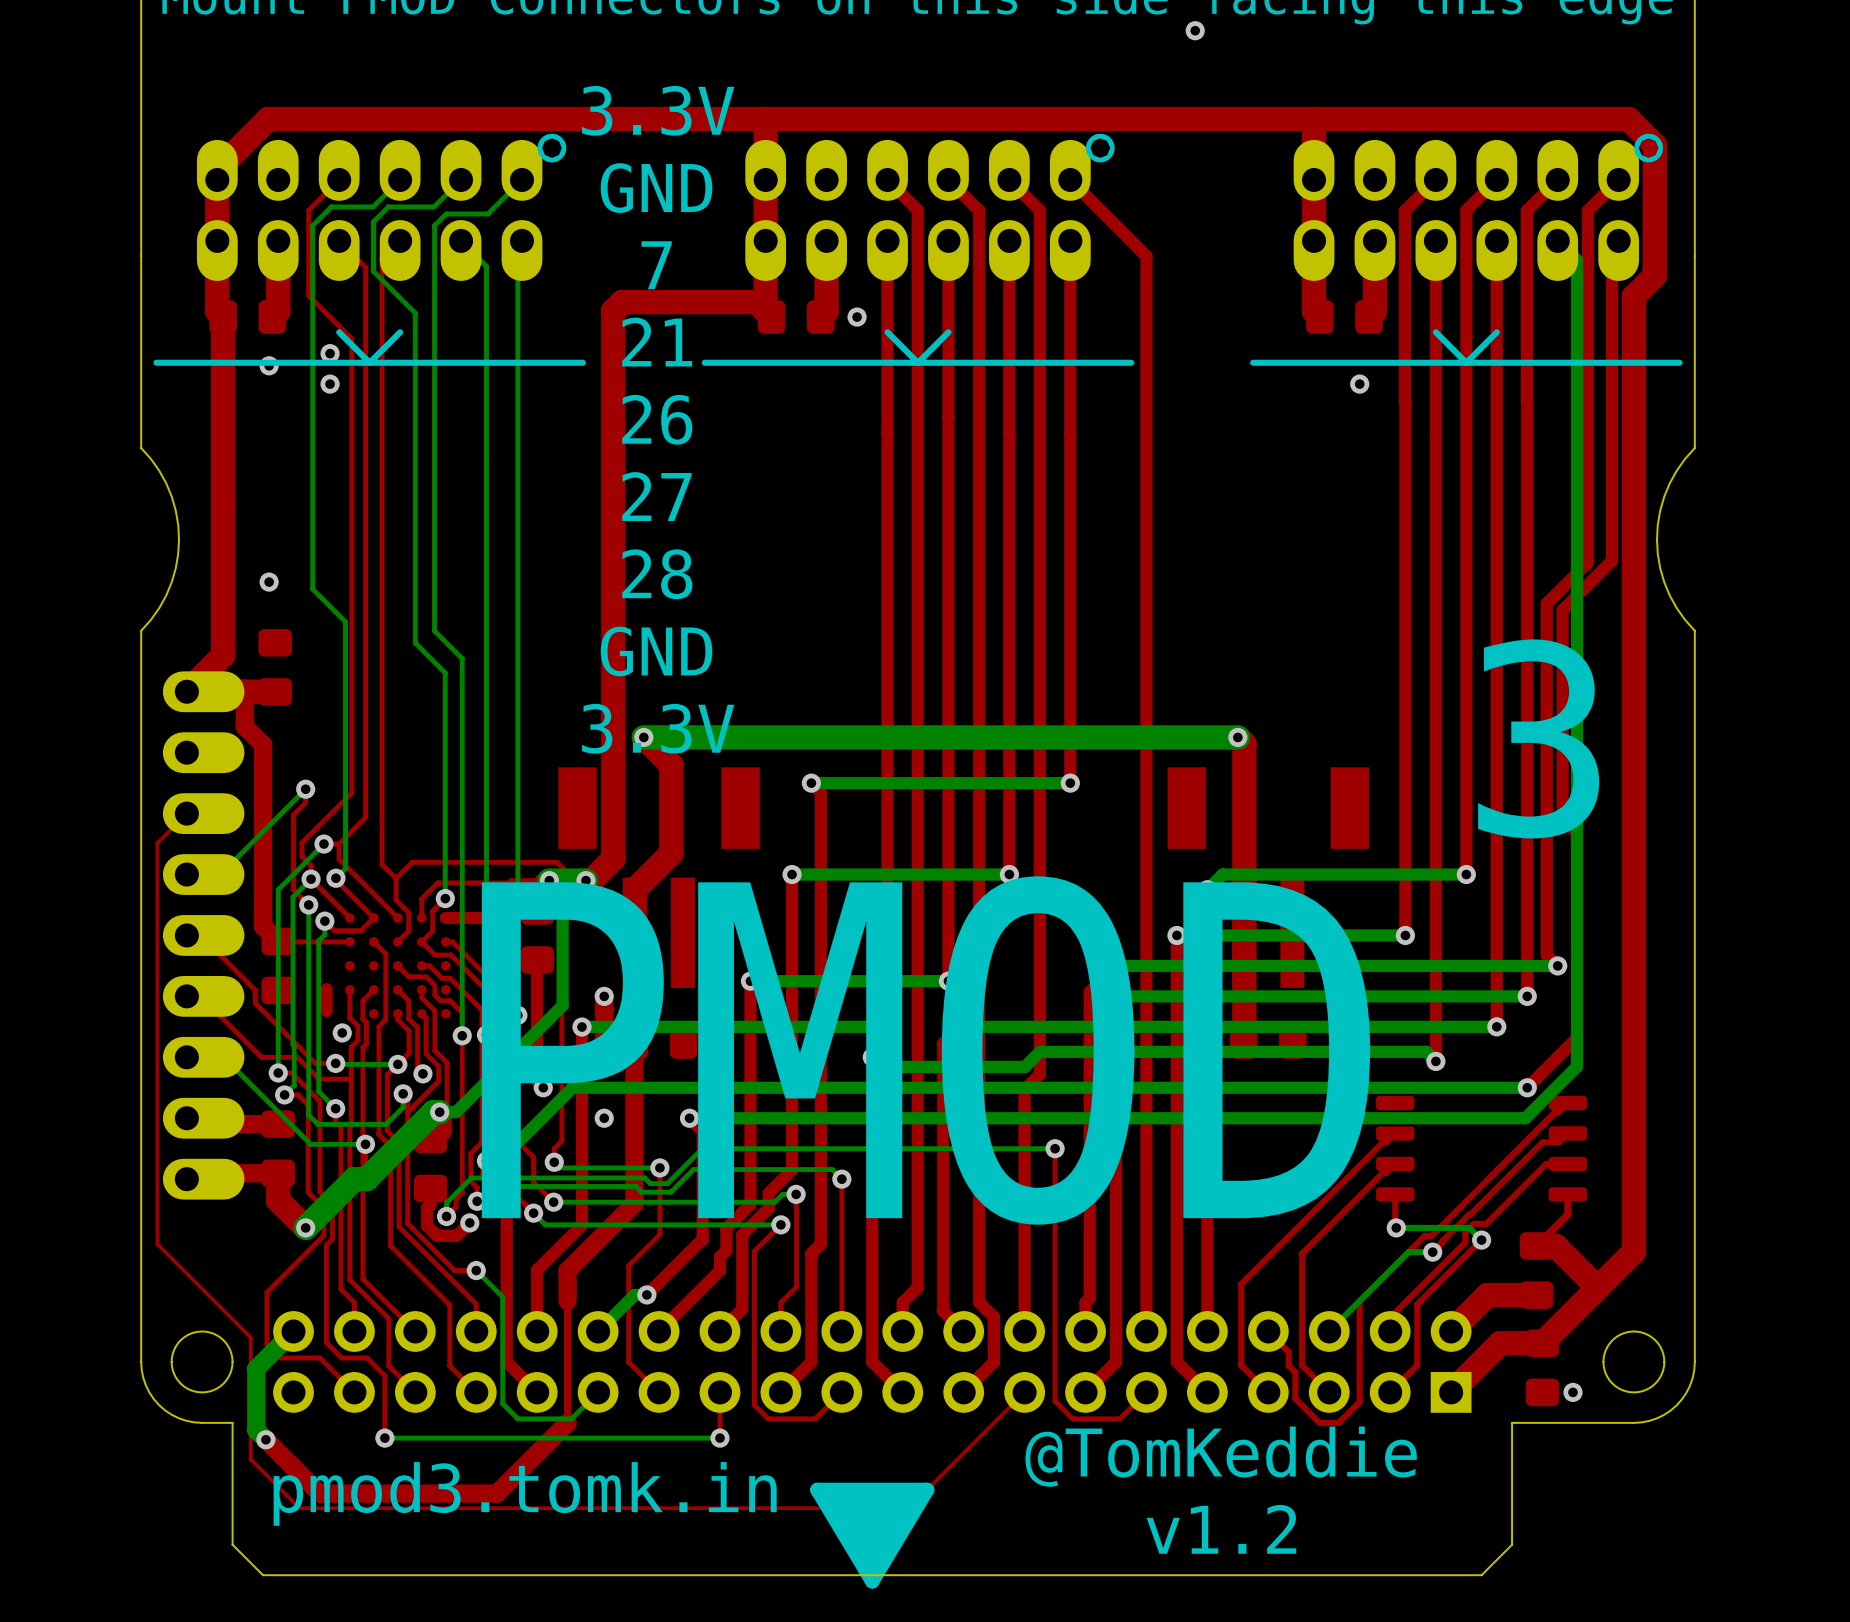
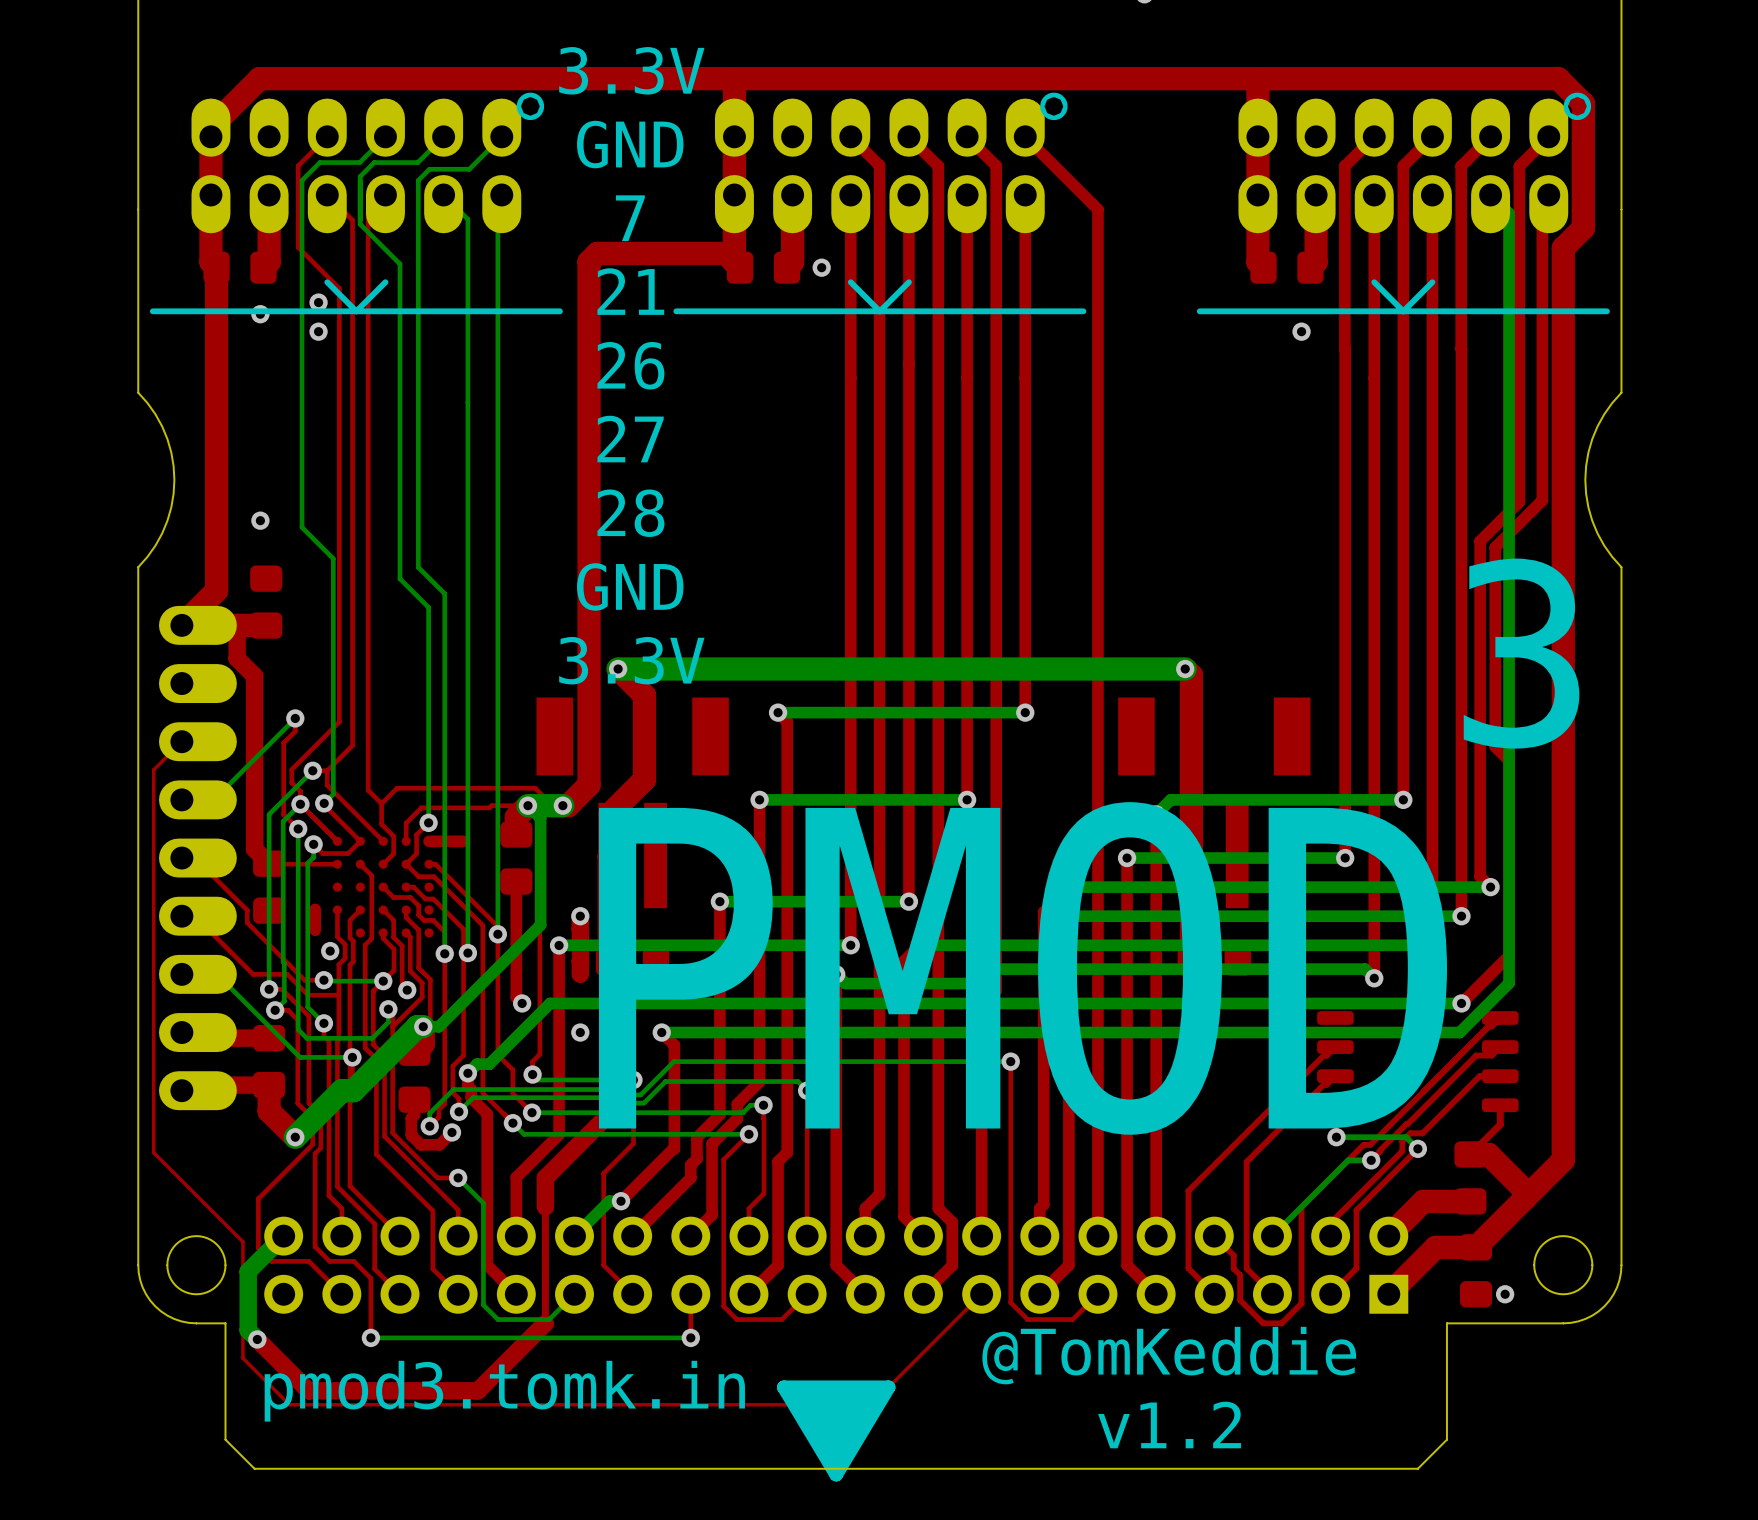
text position: 3 (1538, 738) -> 3 (1521, 653)
text position: PMOD (925, 1050) -> PMOD (1022, 968)

